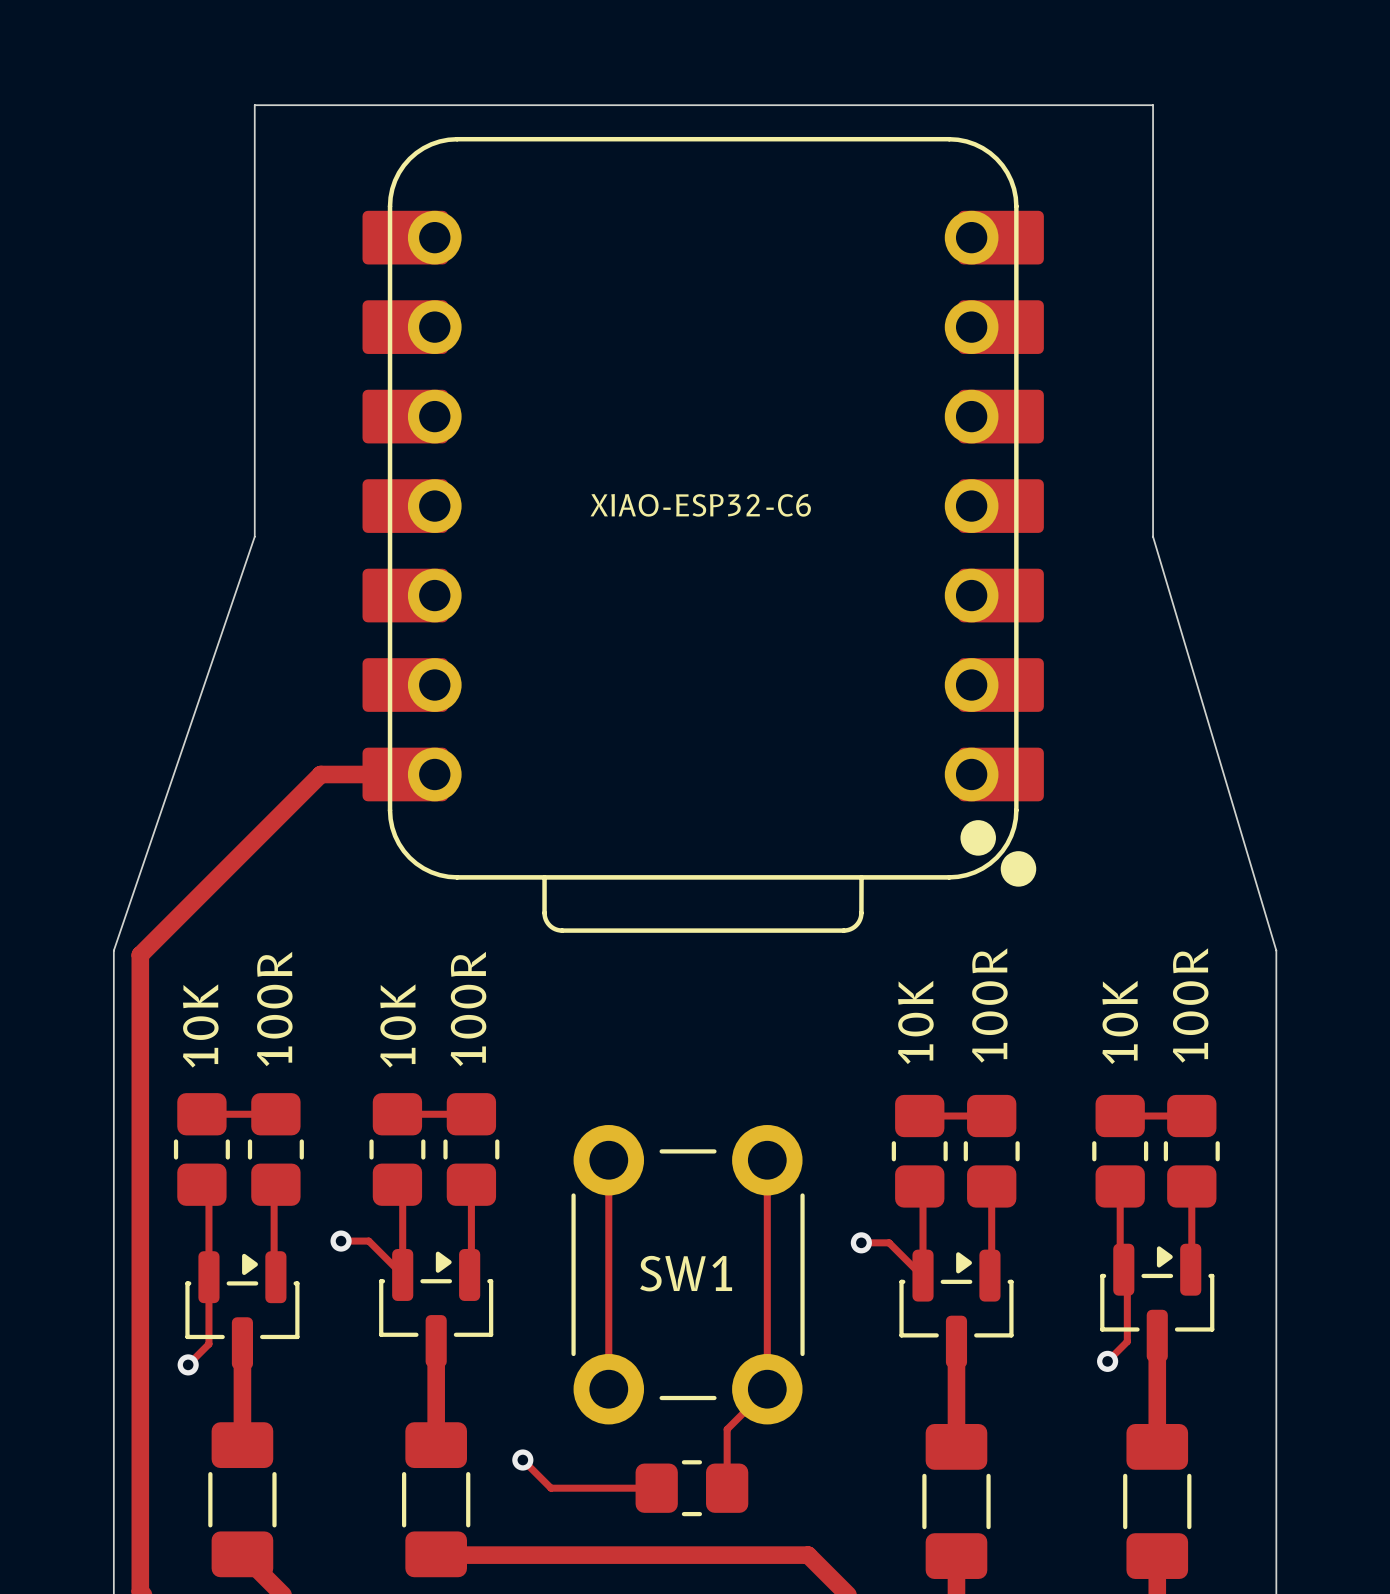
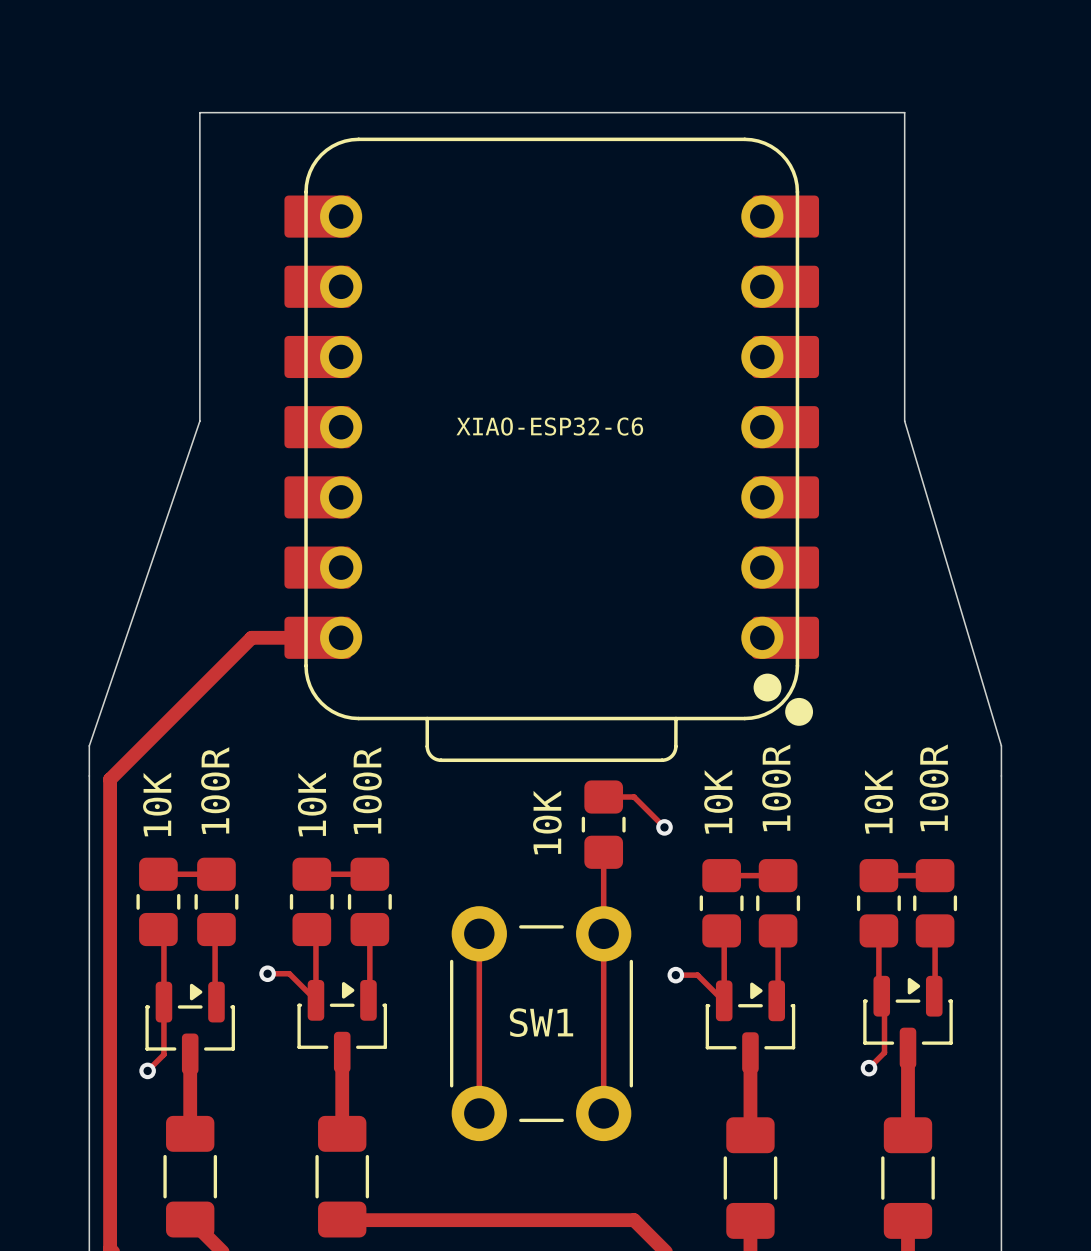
board edge: (254, 143) (254, 105) (1153, 105) (1153, 143) -> (199, 112) (904, 112)
part position: (703, 534) -> (551, 449)
track: (405, 774) (320, 774) (140, 955) (140, 993) -> (318, 637) (251, 637) (110, 779)
track: none -> (603, 797) (634, 797) (664, 827)
part: none -> 10K (603, 824)
via: none -> (664, 827)
track: none -> (603, 852) (603, 1113)
track: (608, 1160) (608, 1389) -> (479, 933) (479, 1113)
track: (767, 1160) (767, 1389) (727, 1429) (727, 1488) -> none
SW1 position: (688, 1274) -> (541, 1023)
track: (522, 1460) (551, 1488) (656, 1488) -> none
via: (522, 1460) -> none
part: (691, 1488) -> none

